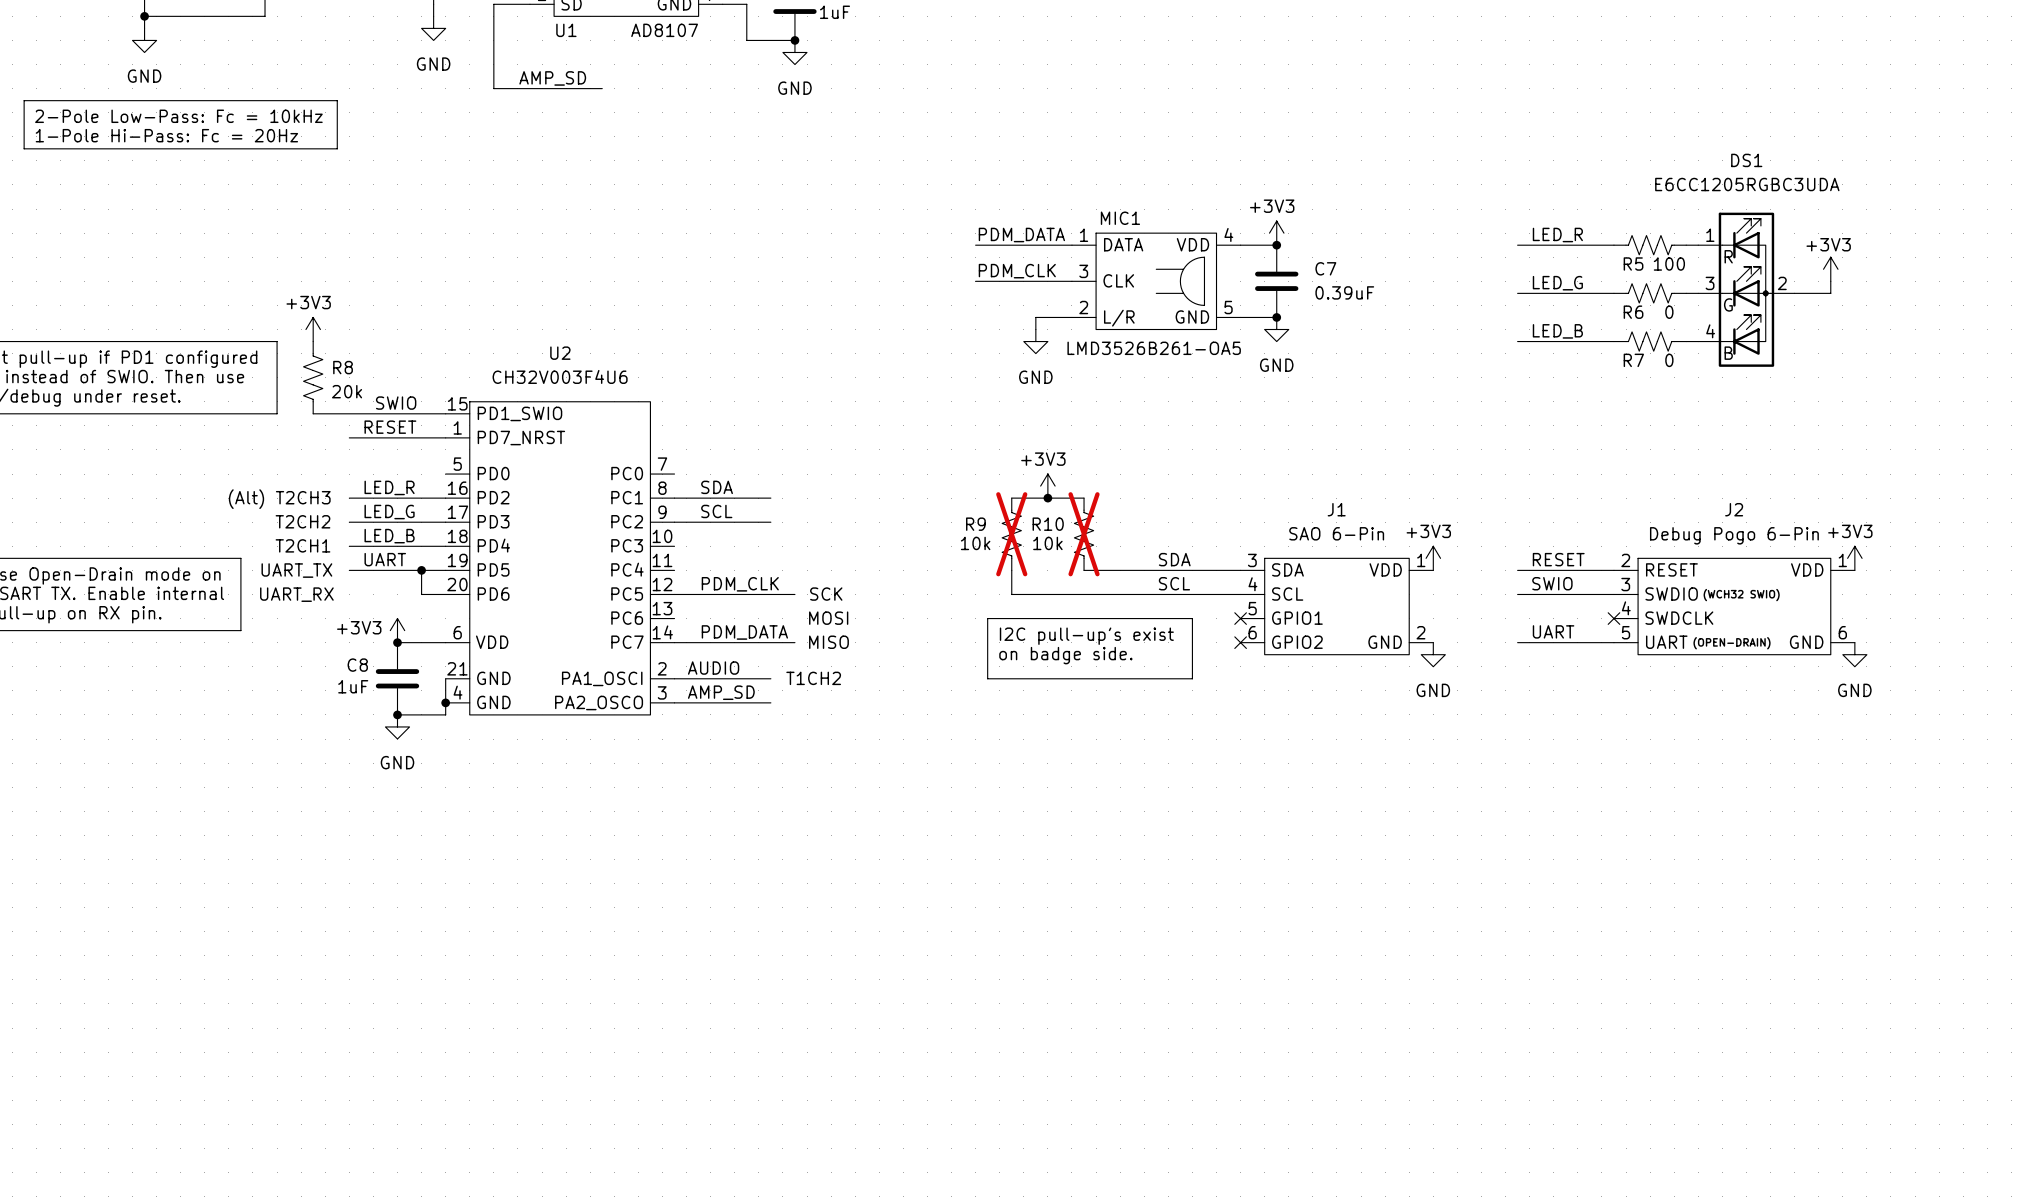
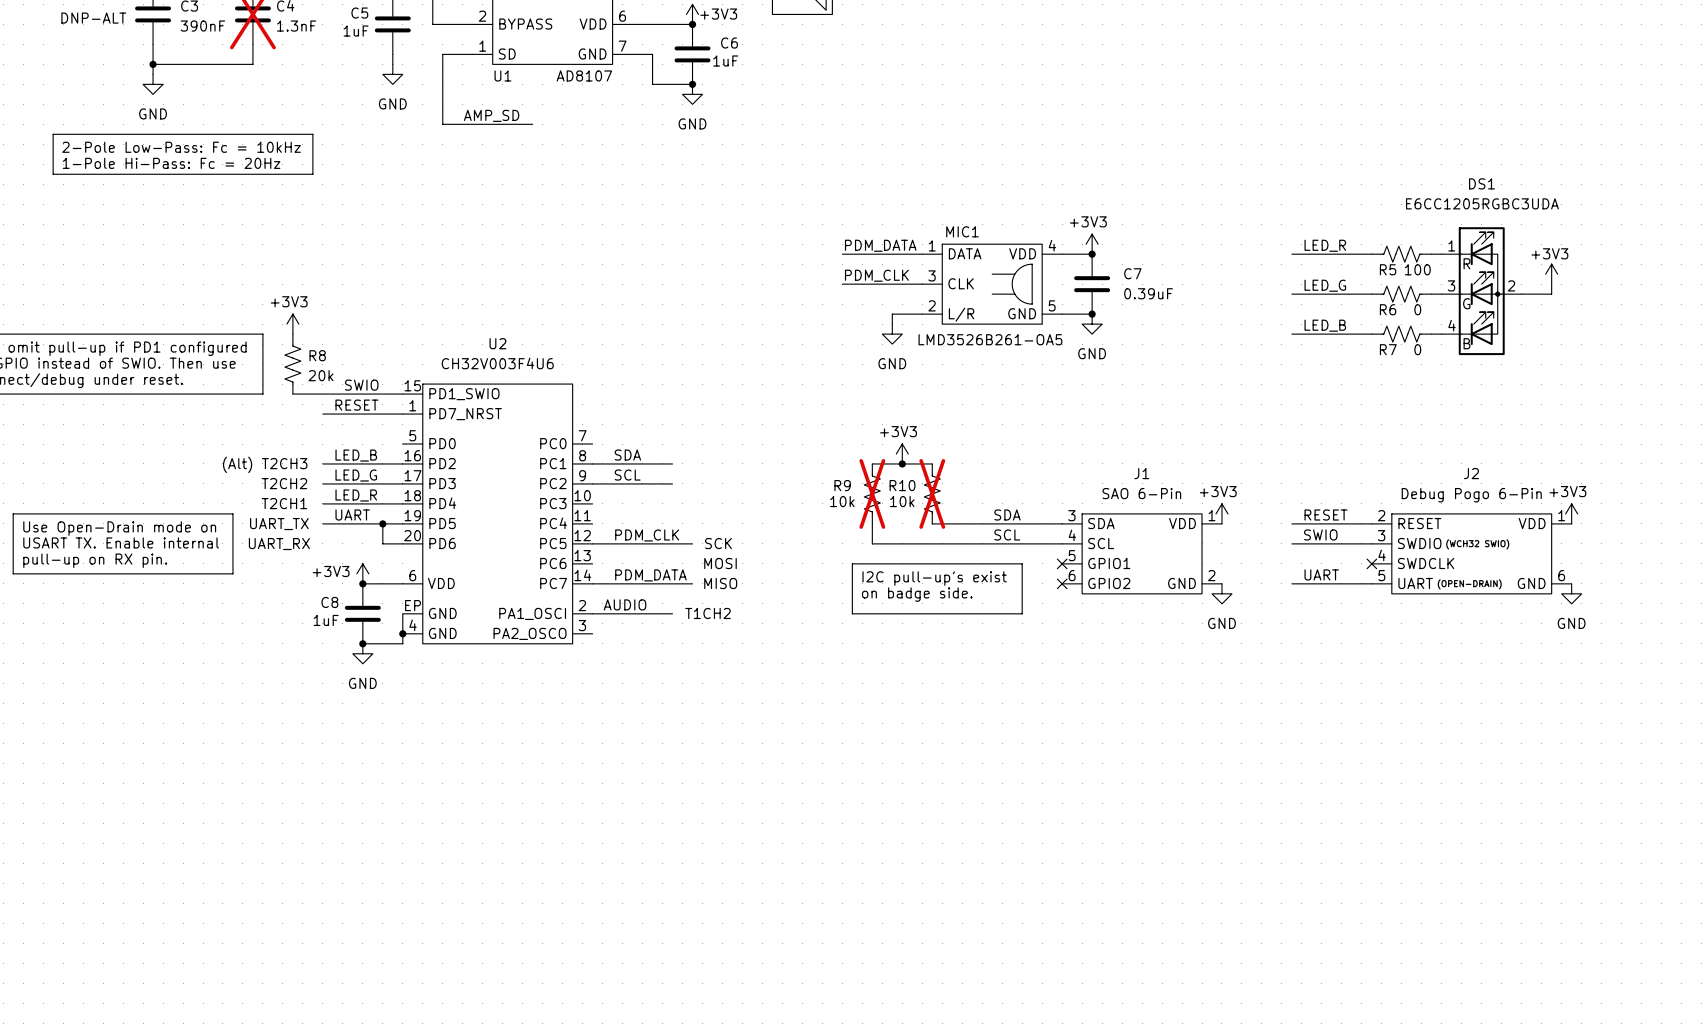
label: LED_R (389, 487) -> LED_B (356, 455)
label: LED_B (389, 536) -> LED_R (356, 495)
U2 pin number: 21 (457, 668) -> EP (413, 605)
label: AMP_SD (721, 692) -> none
wire: (674, 702) (770, 702) -> none

